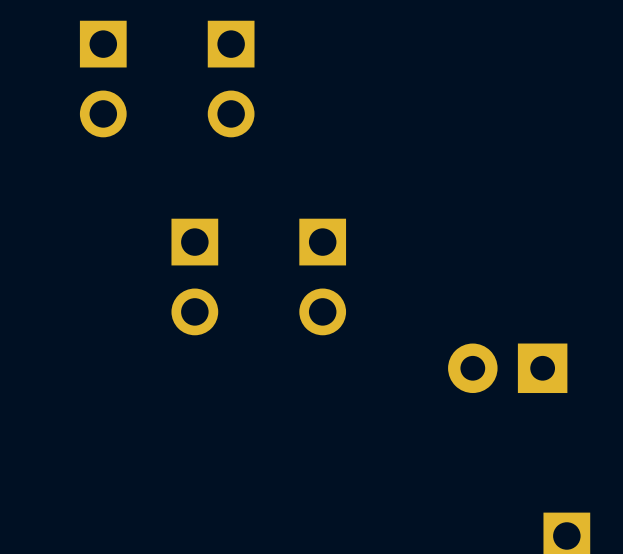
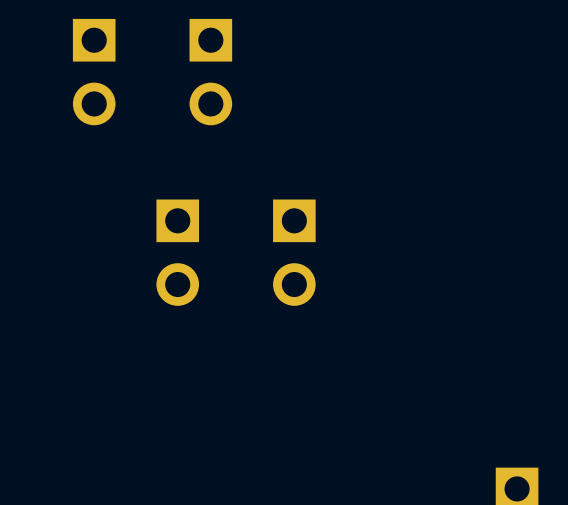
part: (507, 368) -> none

